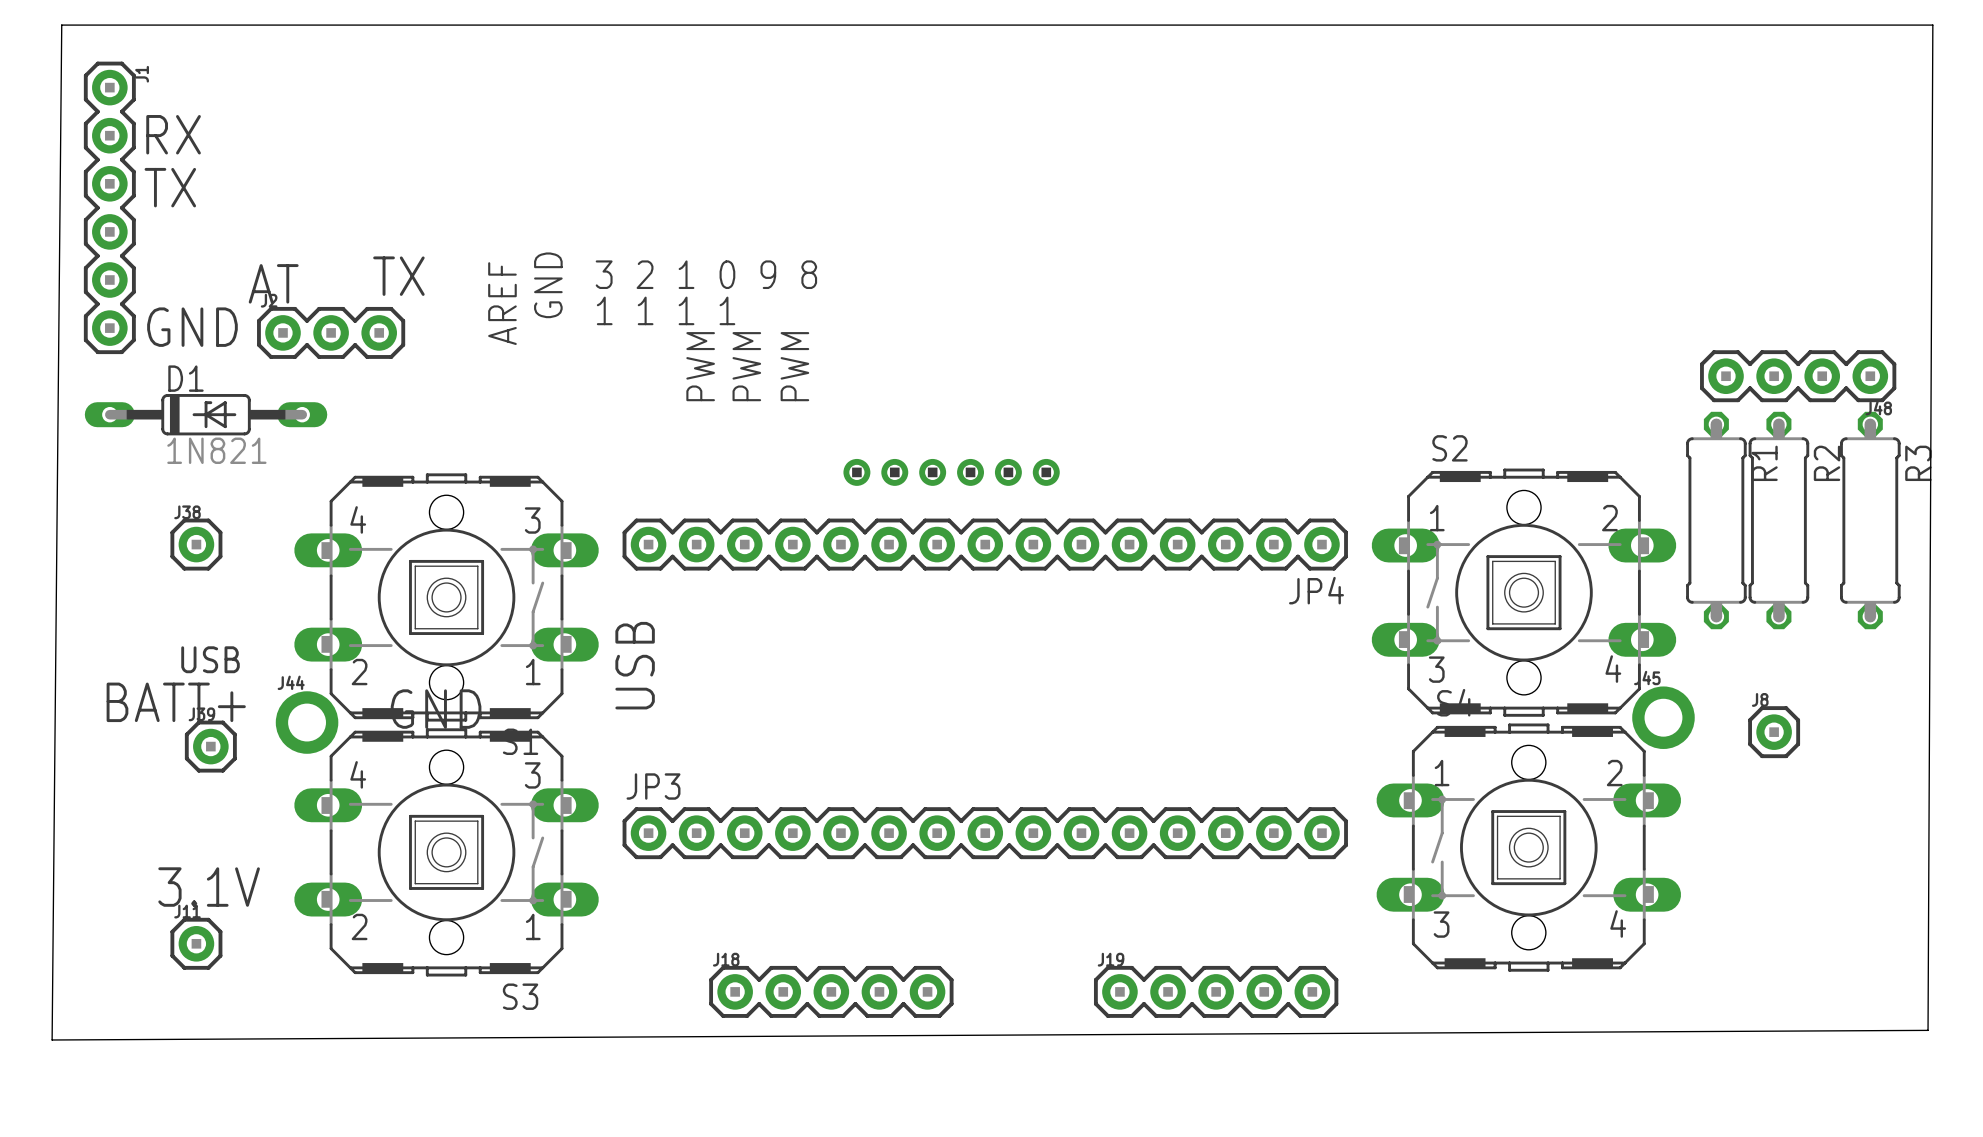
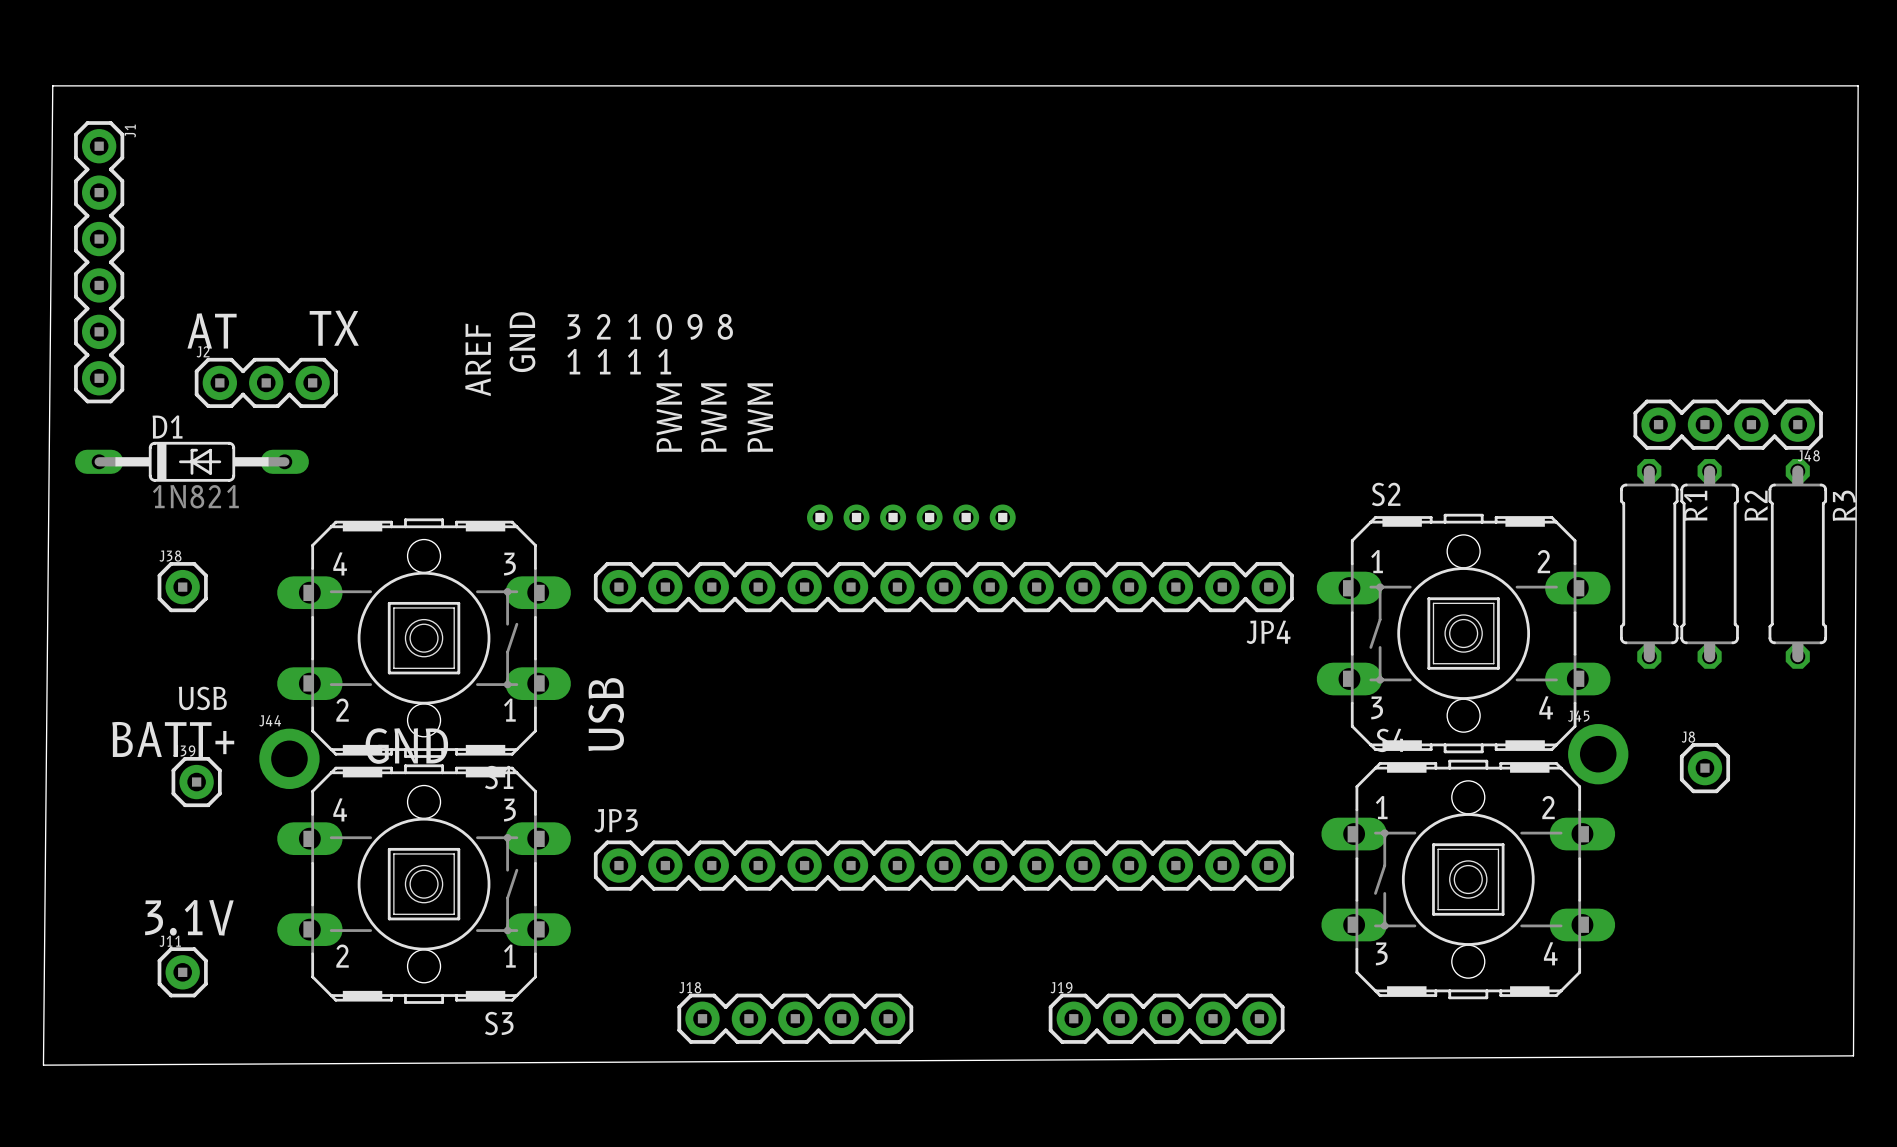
text: RX (173, 134) -> none
text: TX (170, 187) -> none
text position: TX (398, 276) -> TX (334, 328)
text position: AT (273, 283) -> AT (212, 330)
text: GND (192, 327) -> none
J2 position: (331, 332) -> (266, 382)

